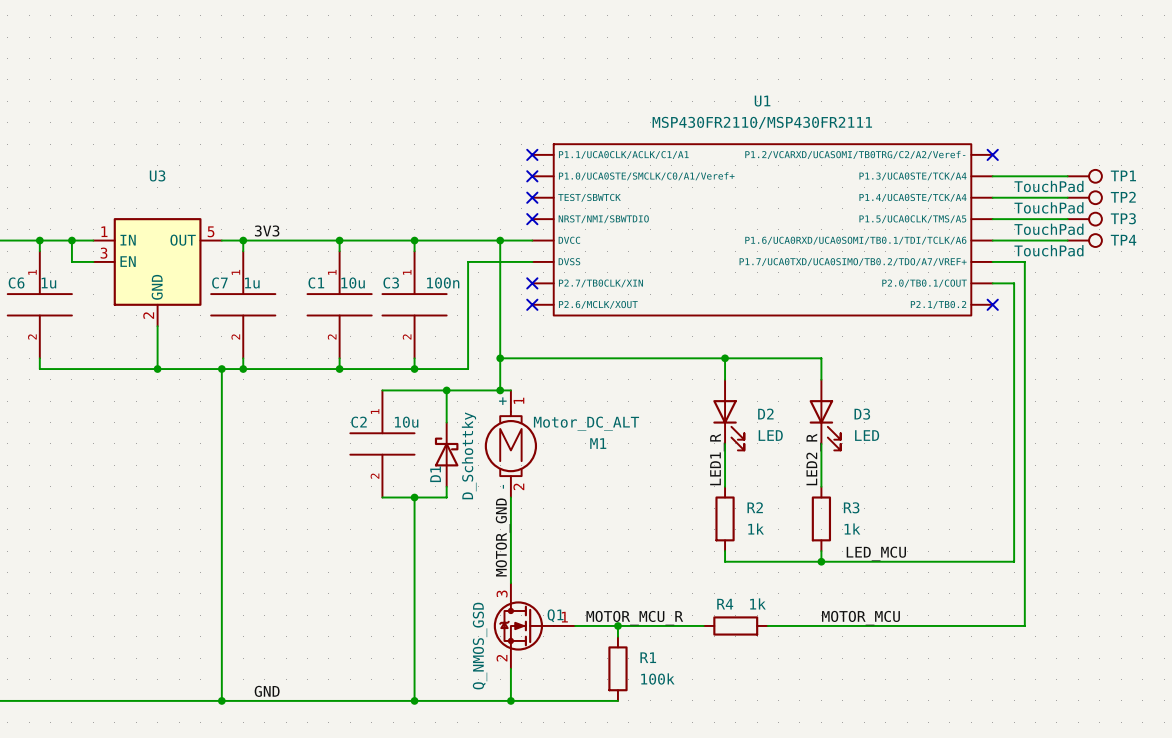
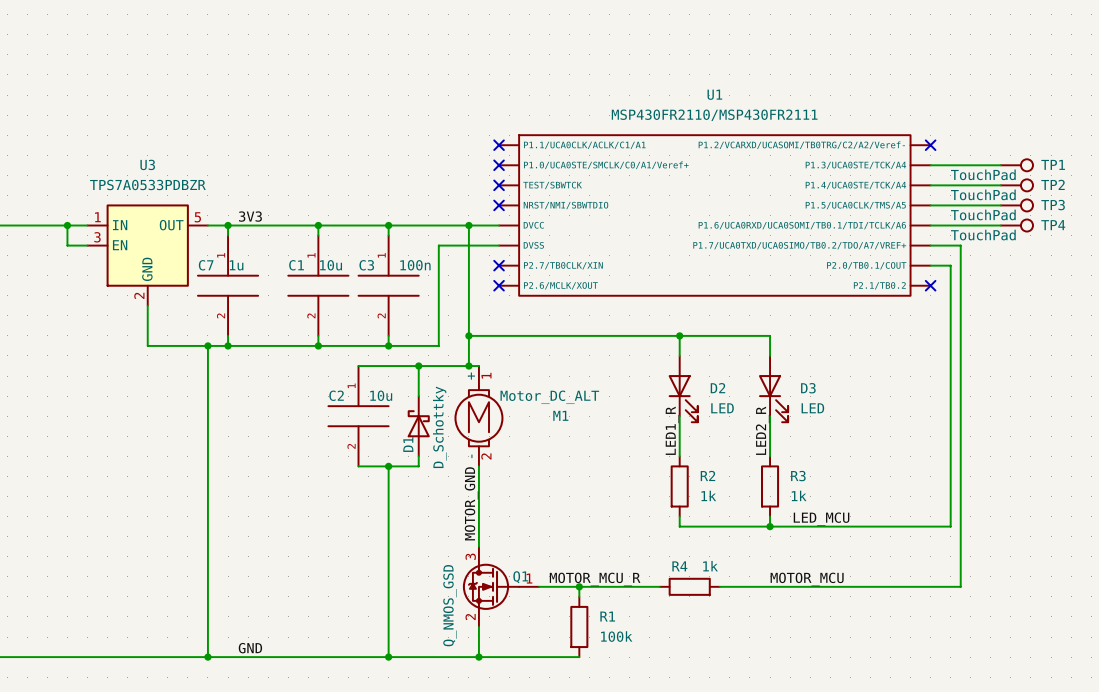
U3 value: none -> TPS7A0533PDBZR (147, 184)
wire: (39, 240) (39, 251) -> none
junction: (39, 240) -> none
C6: 1u (39, 304) -> none
wire: (39, 358) (39, 369) (157, 369) -> none
junction: (157, 369) -> none

